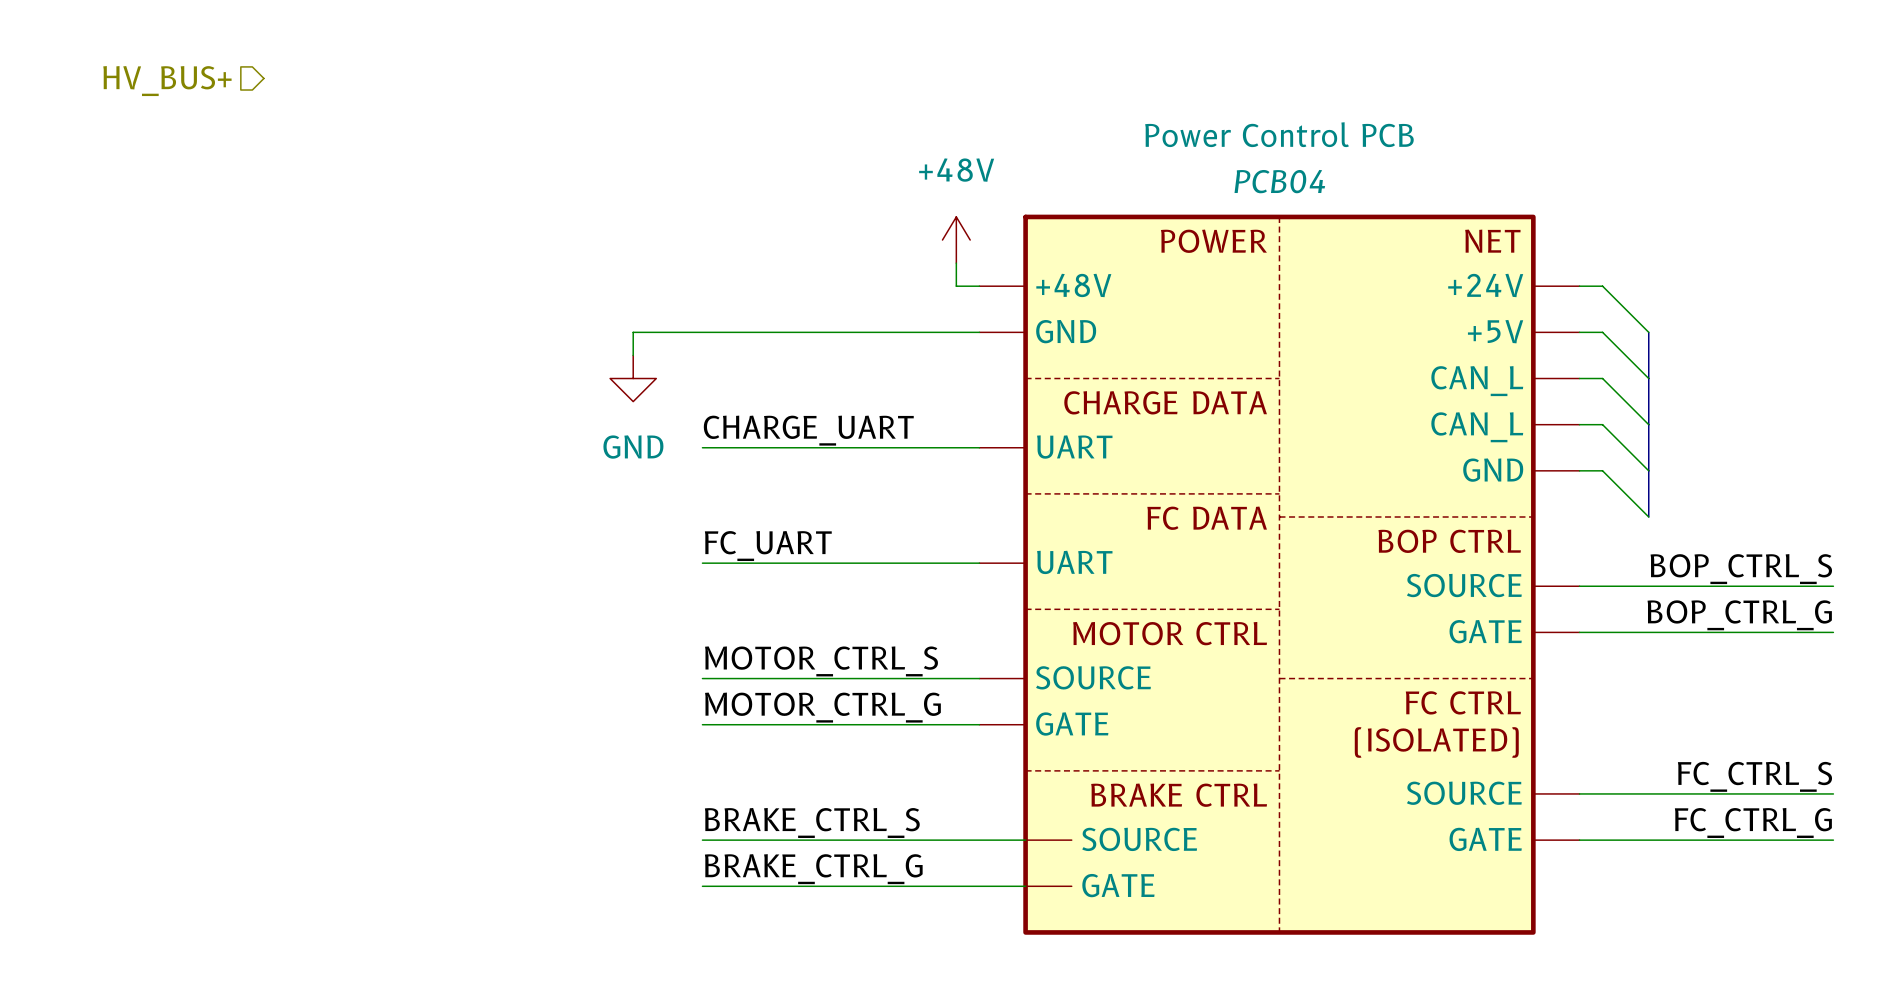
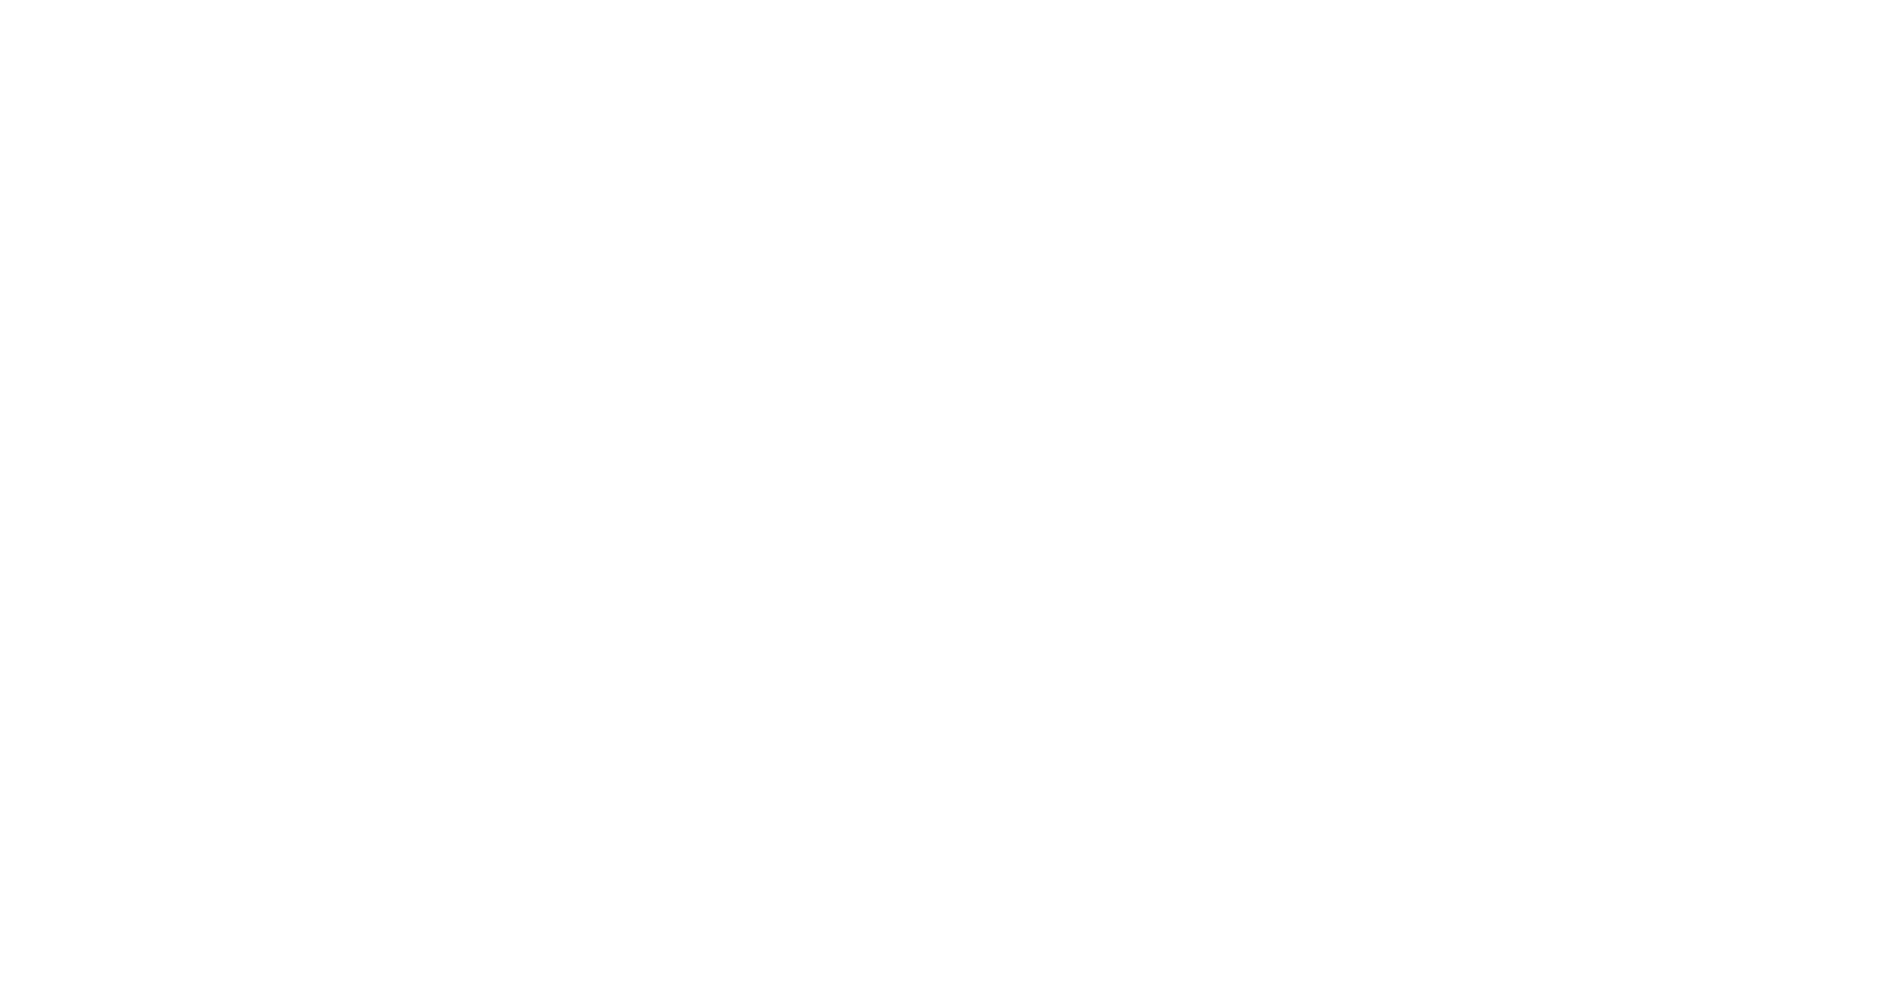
hierarchical label: HV_BUS+ (167, 81) -> none
power symbol: +48V (956, 240) -> none
wire: (956, 263) (956, 286) (979, 286) -> none
wire: (1579, 286) (1602, 286) (1648, 332) -> none
wire: (979, 332) (633, 332) (633, 355) -> none
wire: (1579, 332) (1602, 332) (1648, 378) -> none
bus: (1648, 332) (1648, 517) -> none
power symbol: GND (633, 378) -> none
wire: (1579, 378) (1602, 378) (1648, 424) -> none
wire: (1579, 424) (1602, 424) (1648, 470) -> none
label: CHARGE_UART (808, 430) -> none
wire: (702, 447) (979, 447) -> none
wire: (1579, 470) (1602, 470) (1648, 517) -> none
label: FC_UART (768, 546) -> none
wire: (702, 563) (979, 563) -> none
label: BOP_CTRL_S (1741, 569) -> none
part: (1279, 574) -> none
wire: (1579, 586) (1833, 586) -> none
label: BOP_CTRL_G (1739, 615) -> none
wire: (1579, 632) (1833, 632) -> none
label: MOTOR_CTRL_S (821, 661) -> none
wire: (702, 678) (979, 678) -> none
label: MOTOR_CTRL_G (822, 707) -> none
wire: (702, 724) (979, 724) -> none
label: FC_CTRL_S (1754, 776) -> none
wire: (1579, 793) (1833, 793) -> none
label: BRAKE_CTRL_S (812, 822) -> none
label: FC_CTRL_G (1753, 822) -> none
wire: (702, 840) (1025, 840) -> none
wire: (1579, 840) (1833, 840) -> none
label: BRAKE_CTRL_G (813, 869) -> none
wire: (702, 886) (1025, 886) -> none

